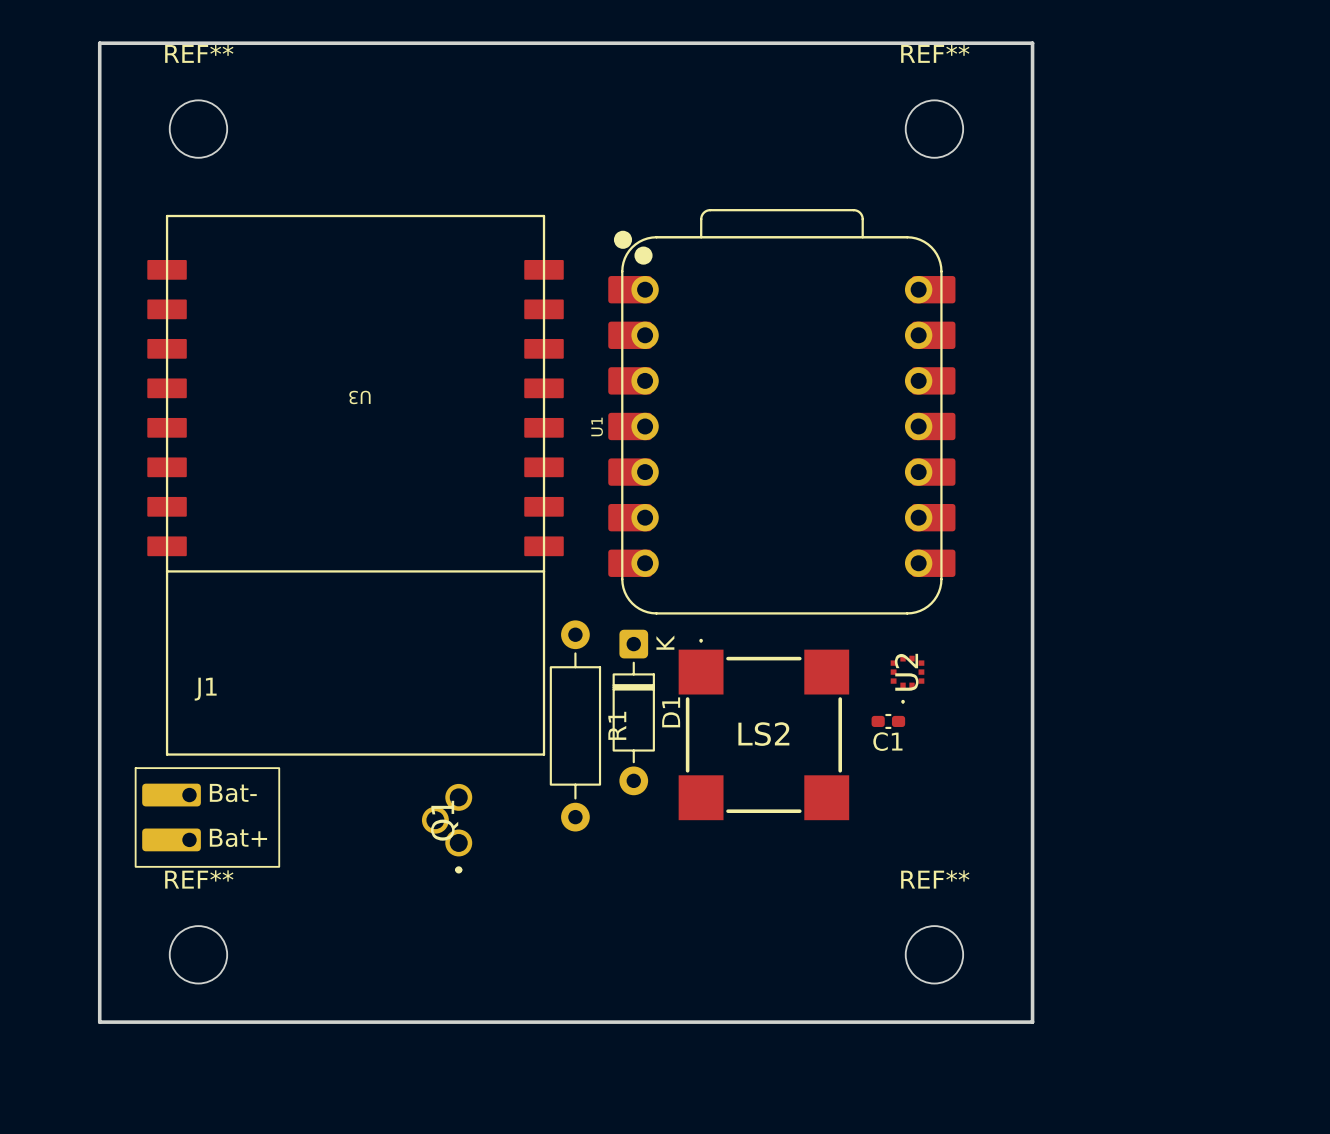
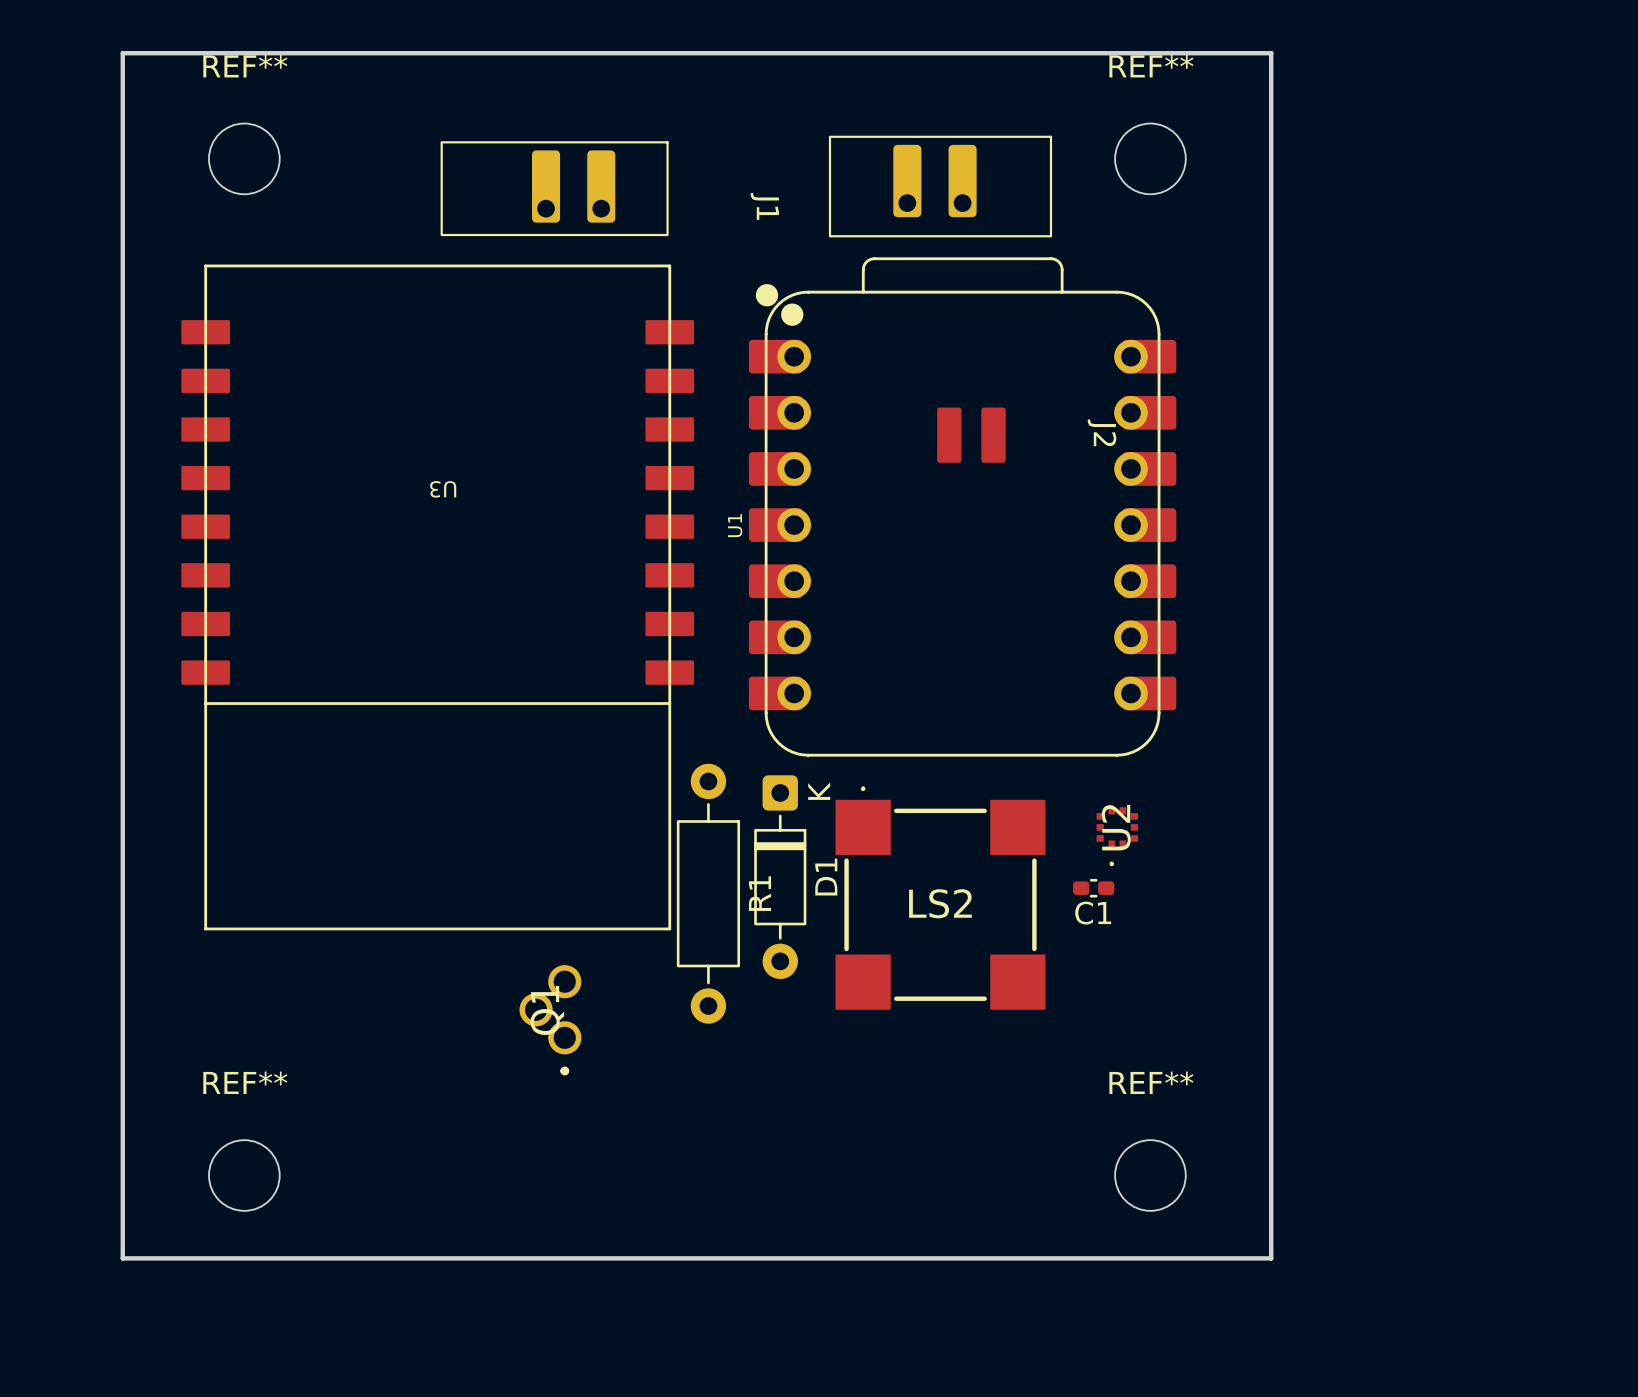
part: none -> (940, 186)
J2: none -> (971, 435)
J1 name position: J1 (205, 689) -> J1 (764, 206)
J1 footprint: [134, 767, 281, 868] -> [440, 141, 669, 237]

